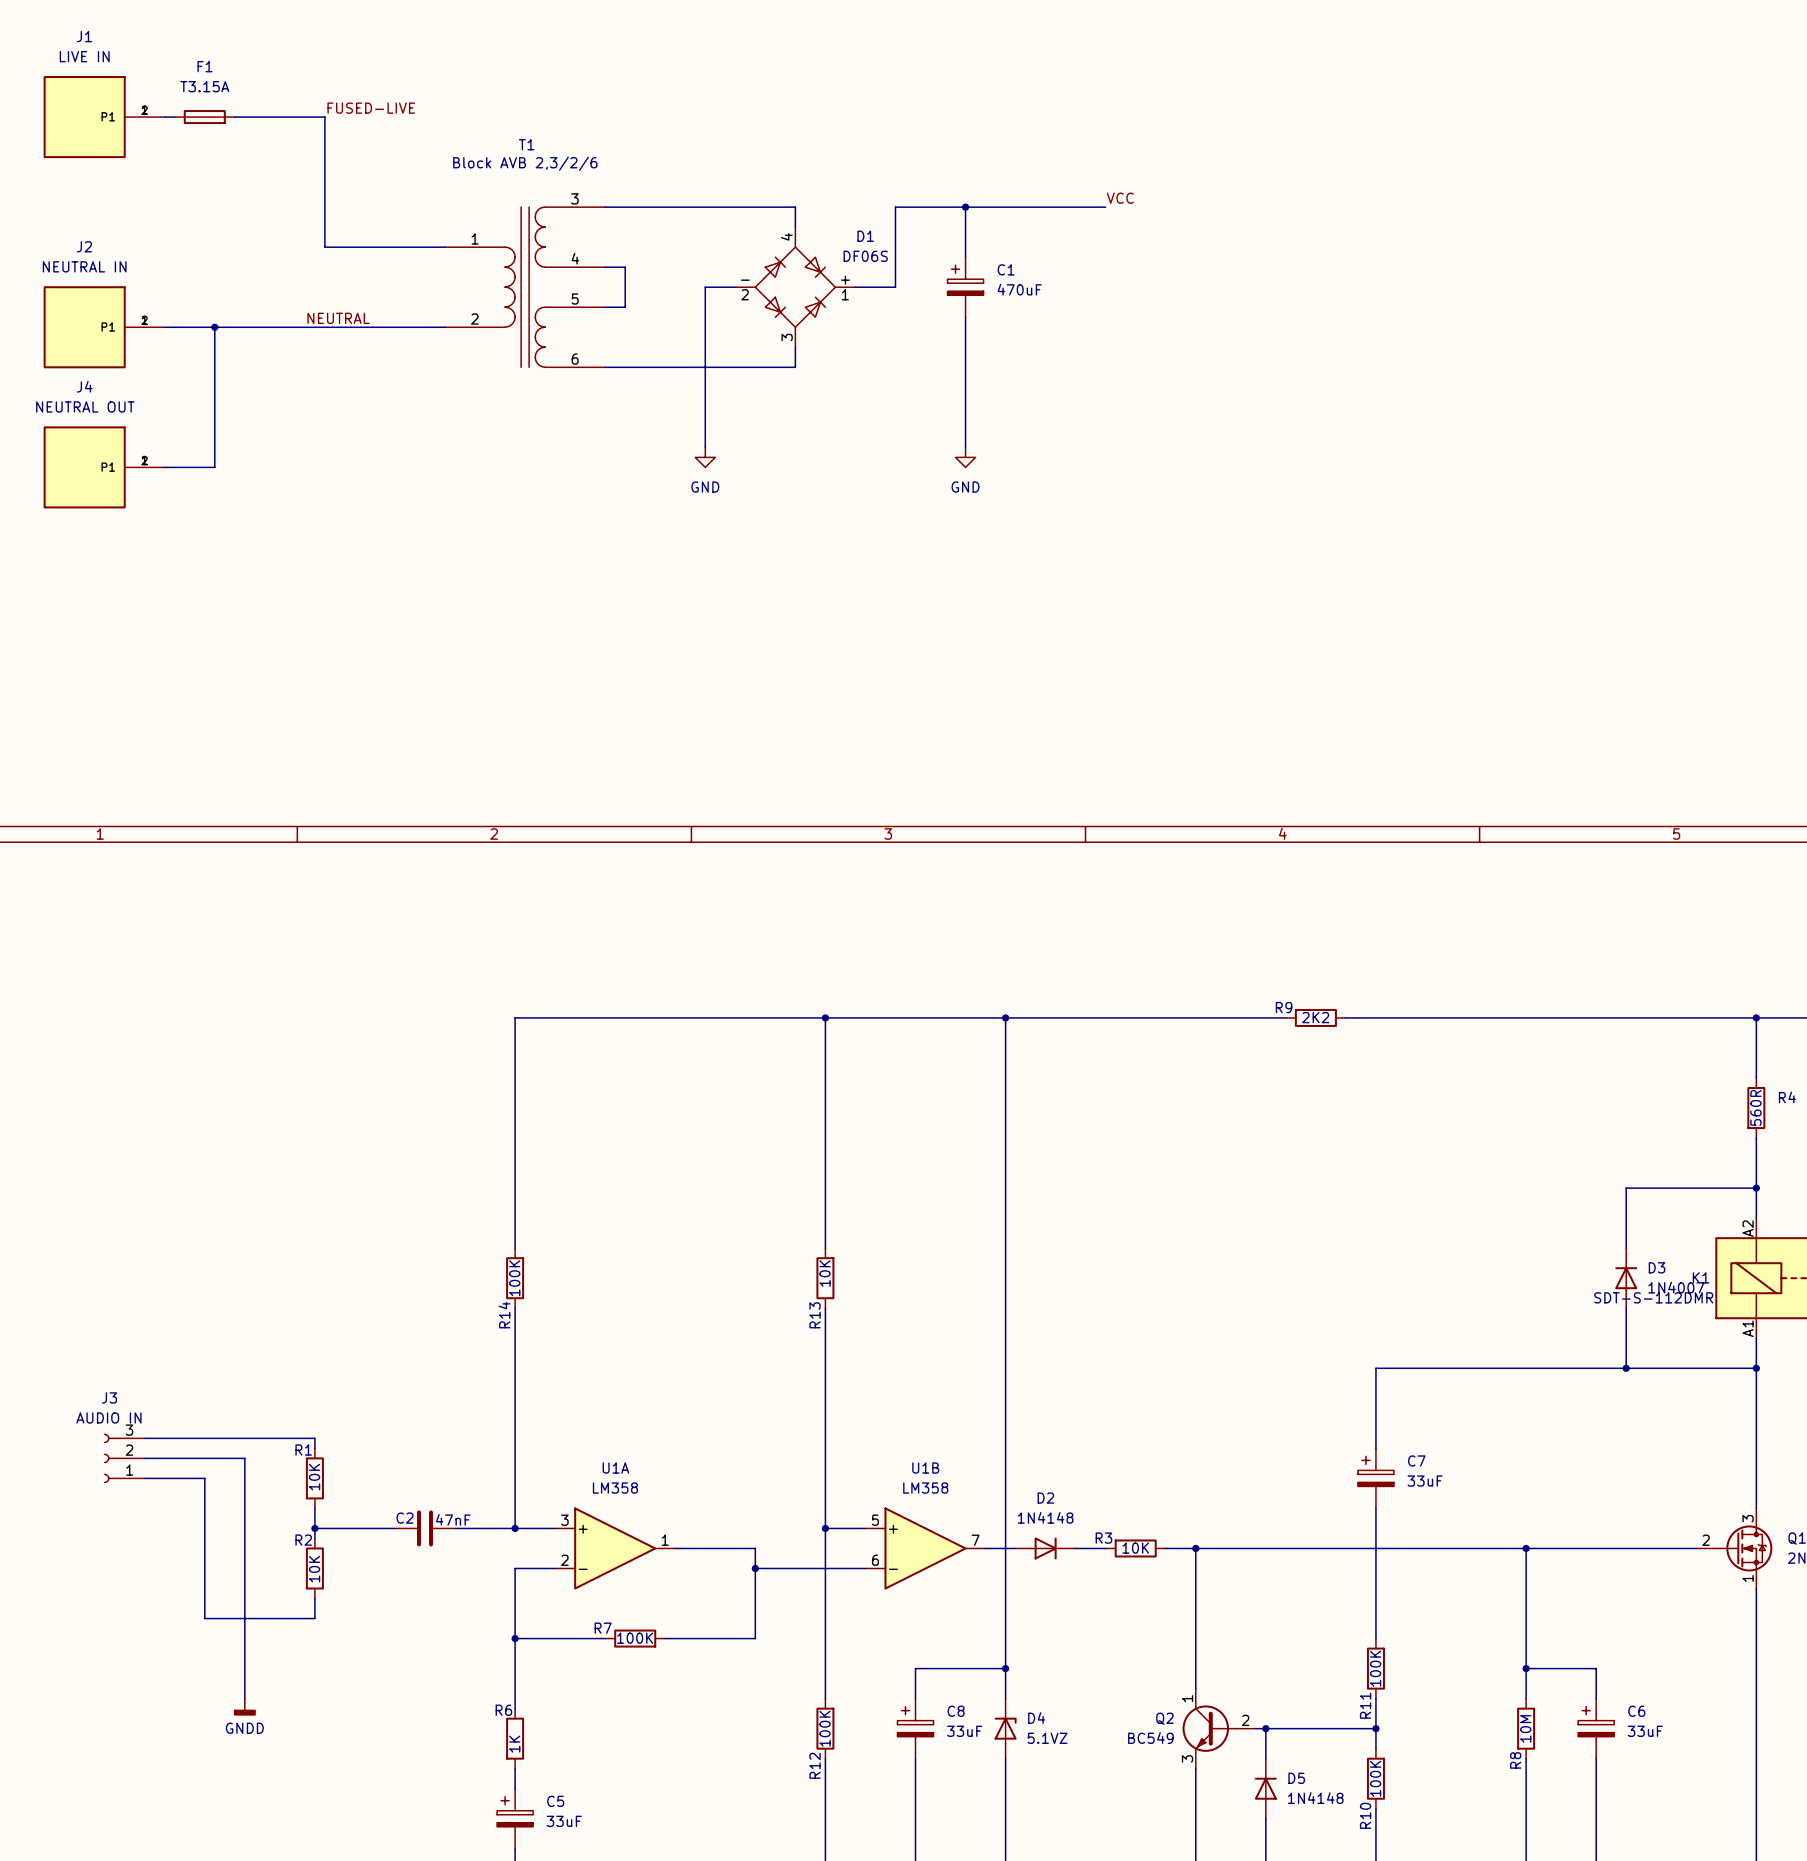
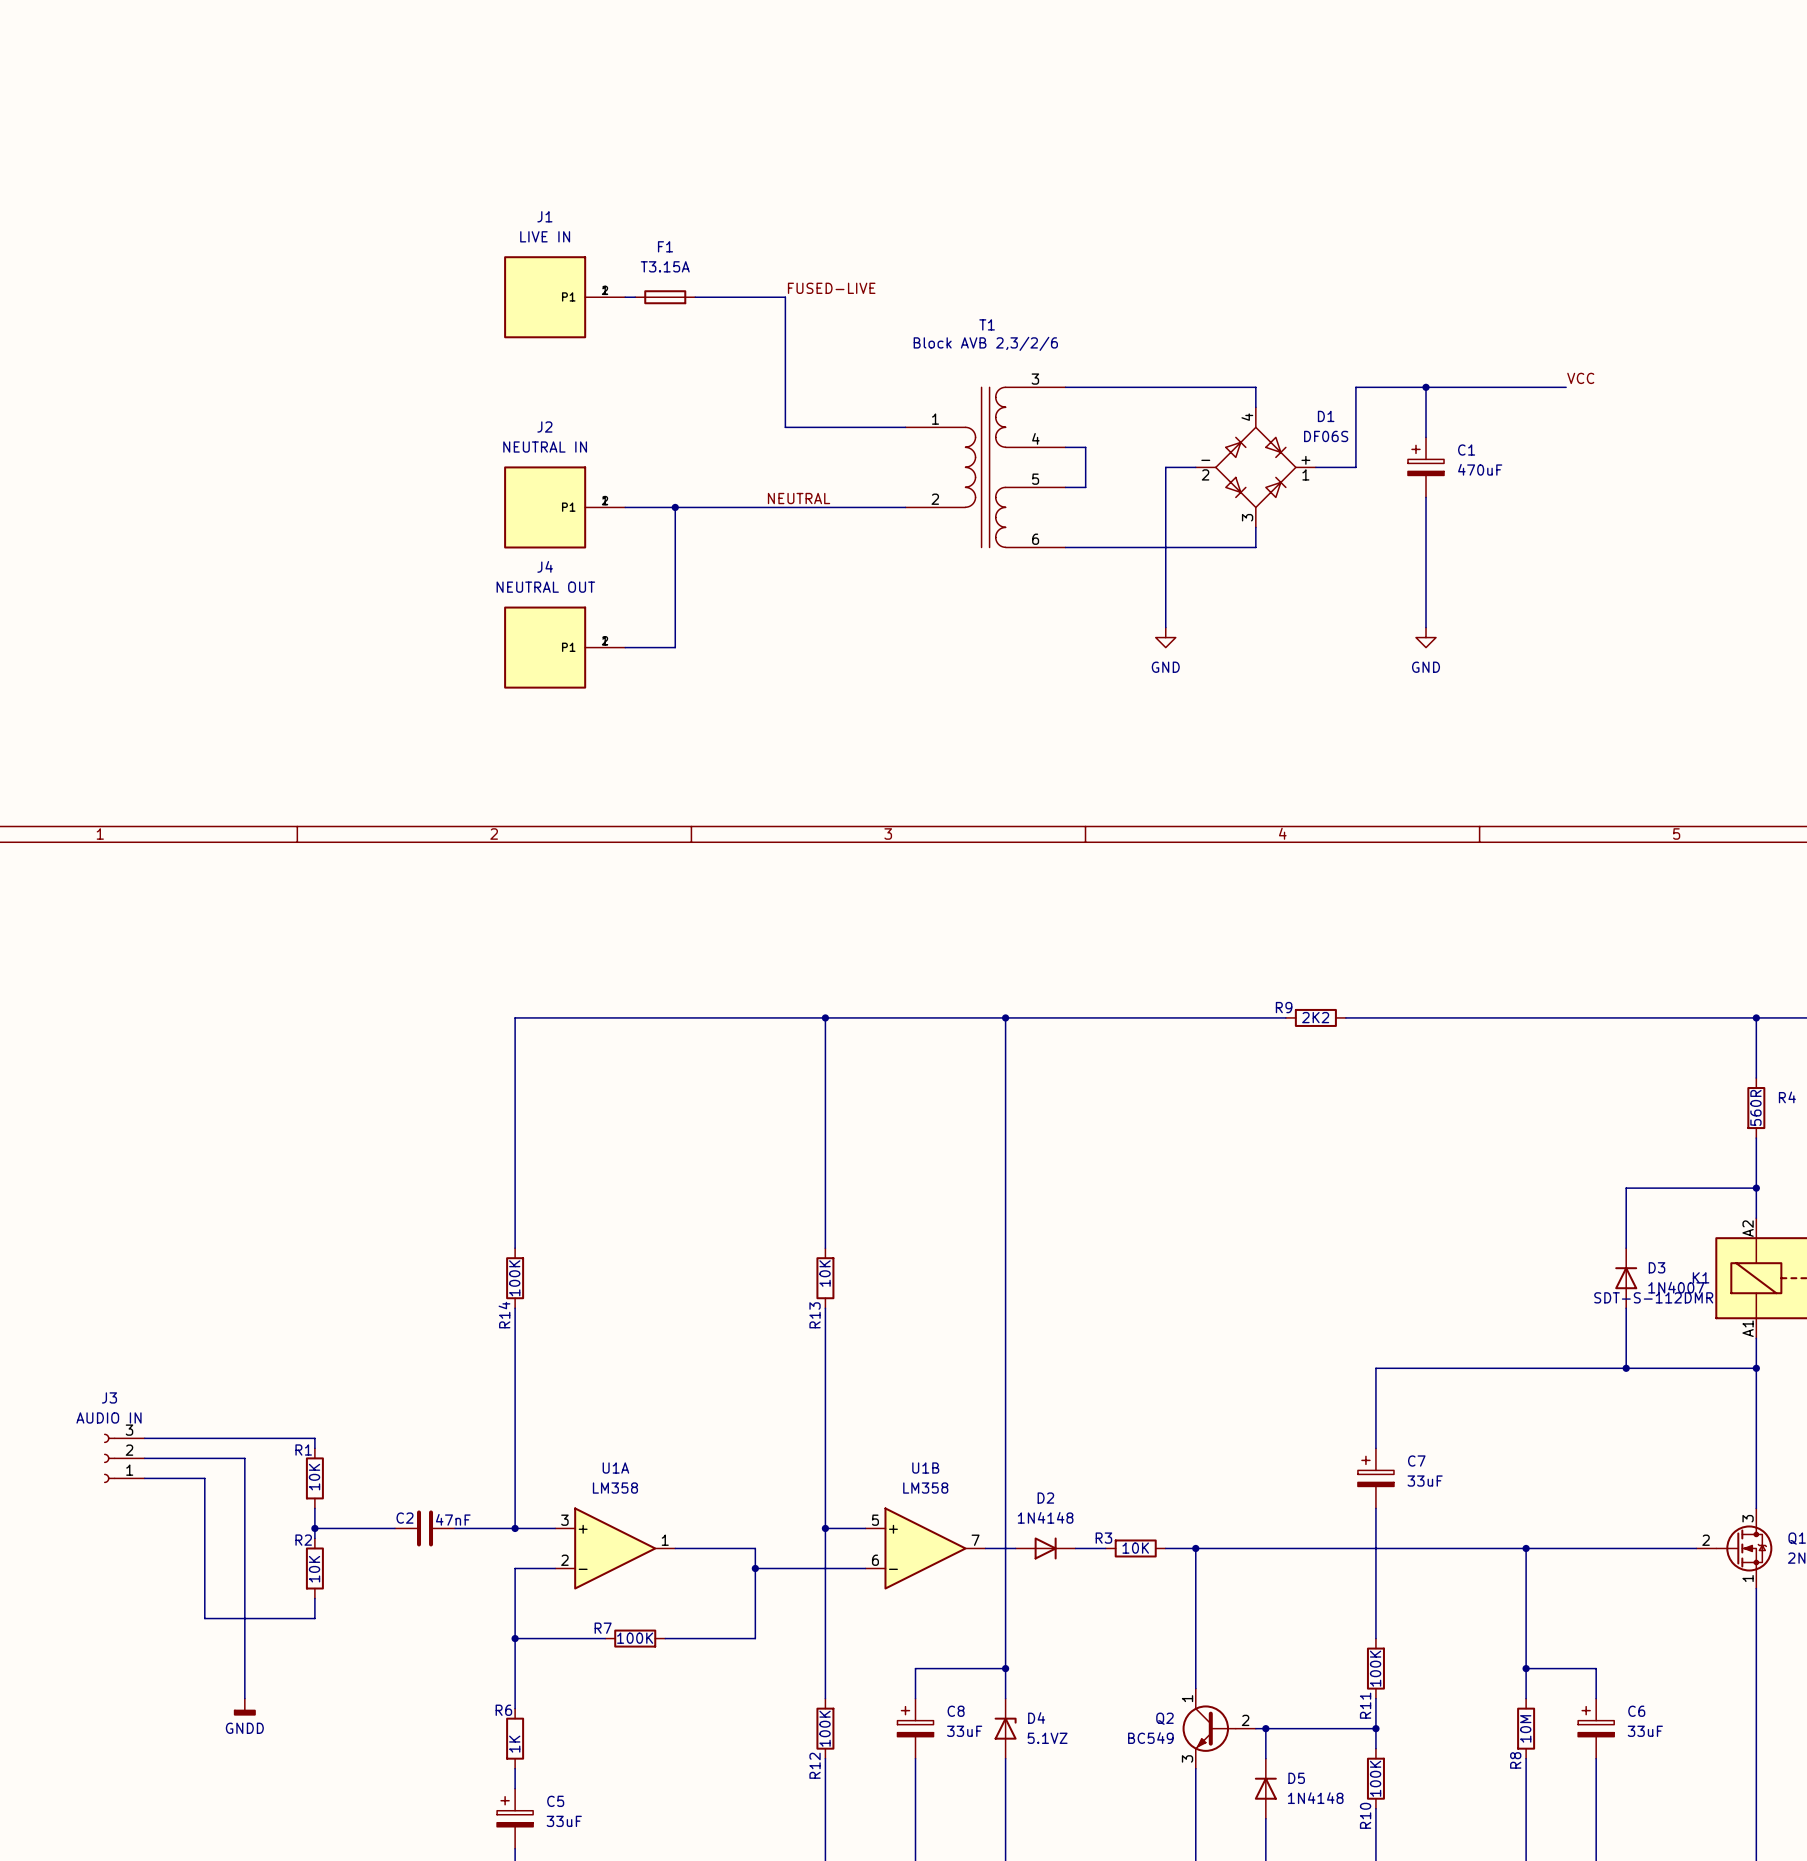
label: FUSED-LIVE (371, 108) -> none
J1 position: (104, 117) -> (564, 297)
wire: (164, 117) (174, 117) -> none
F1 position: (204, 117) -> (665, 297)
wire: (234, 117) (324, 117) (324, 247) (445, 247) -> none
label: VCC (1120, 198) -> none
wire: (605, 207) (795, 207) (795, 227) -> none
wire: (965, 207) (965, 257) -> none
junction: (965, 207) -> none
wire: (1105, 207) (895, 207) (895, 287) (855, 287) -> none
wire: (605, 267) (625, 267) (625, 307) (605, 307) -> none
T1 position: (525, 287) -> (985, 467)
wire: (735, 287) (705, 287) (705, 447) -> none
D1 position: (795, 287) -> (1255, 467)
C1 position: (965, 287) -> (1426, 467)
label: none -> FUSED-LIVE (831, 288)
wire: none -> (625, 297) (635, 297)
wire: none -> (695, 297) (785, 297) (785, 427) (905, 427)
wire: (965, 317) (965, 447) -> none
label: NEUTRAL (338, 318) -> none
J2 position: (104, 327) -> (564, 507)
wire: (164, 327) (445, 327) -> none
wire: (214, 327) (214, 467) (164, 467) -> none
junction: (214, 327) -> none
wire: (795, 347) (795, 367) (605, 367) -> none
label: none -> VCC (1580, 378)
wire: none -> (1065, 387) (1255, 387) (1255, 407)
wire: none -> (1426, 387) (1426, 437)
junction: none -> (1426, 387)
wire: none -> (1566, 387) (1355, 387) (1355, 467) (1315, 467)
wire: none -> (1065, 447) (1085, 447) (1085, 487) (1065, 487)
power symbol: GND (705, 457) -> none
power symbol: GND (965, 457) -> none
J4 position: (104, 467) -> (564, 647)
wire: none -> (1195, 467) (1165, 467) (1165, 627)
wire: none -> (1426, 497) (1426, 627)
label: none -> NEUTRAL (799, 498)
wire: none -> (625, 507) (905, 507)
wire: none -> (675, 507) (675, 647) (625, 647)
junction: none -> (675, 507)
wire: none -> (1255, 527) (1255, 547) (1065, 547)
power symbol: none -> GND (1165, 637)
power symbol: none -> GND (1426, 637)

